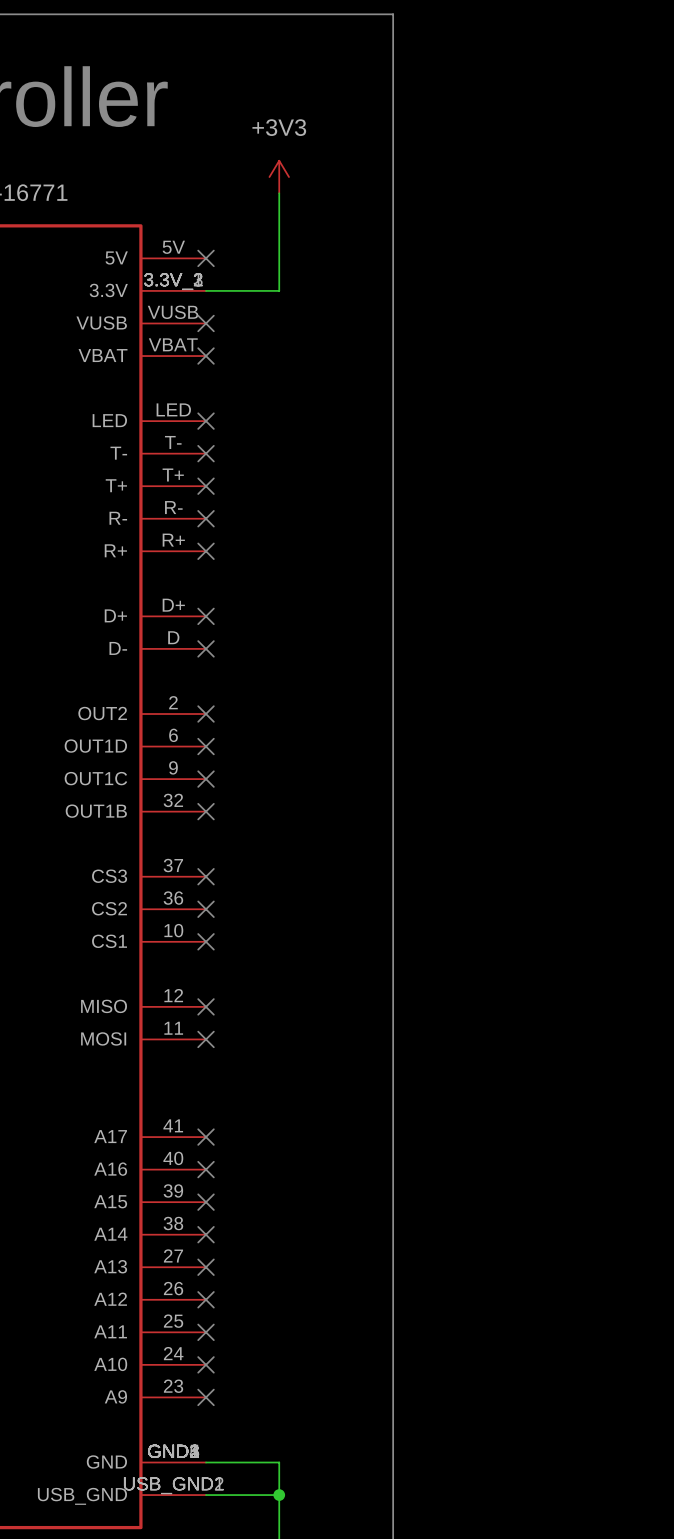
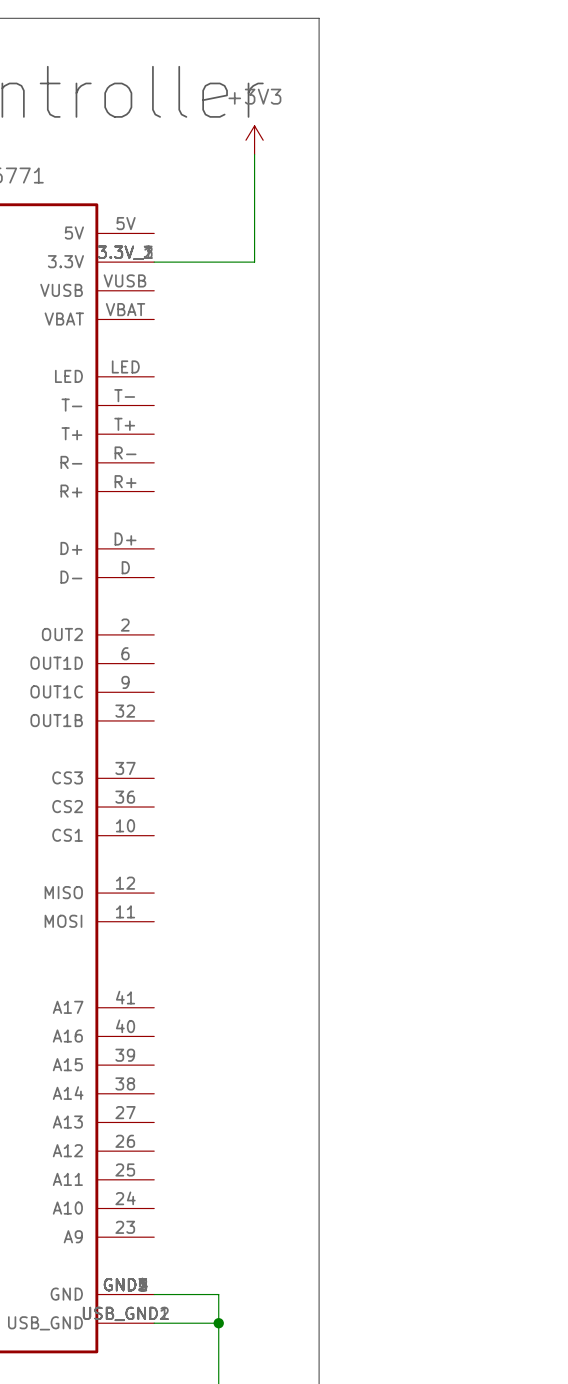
power symbol position: +3V3 (279, 177) -> +3V3 (254, 140)
wire: (279, 193) (279, 290) -> (254, 154) (254, 262) (218, 262)
no-connect mark: (206, 258) -> none
no-connect mark: (206, 323) -> none
no-connect mark: (206, 356) -> none
no-connect mark: (206, 421) -> none
no-connect mark: (206, 453) -> none
no-connect mark: (206, 486) -> none
no-connect mark: (206, 518) -> none
no-connect mark: (206, 551) -> none
no-connect mark: (206, 616) -> none
no-connect mark: (206, 648) -> none
no-connect mark: (206, 714) -> none
no-connect mark: (206, 746) -> none
no-connect mark: (206, 779) -> none
no-connect mark: (206, 811) -> none
no-connect mark: (206, 876) -> none
no-connect mark: (206, 909) -> none
no-connect mark: (206, 941) -> none
no-connect mark: (206, 1006) -> none
no-connect mark: (206, 1039) -> none
no-connect mark: (206, 1137) -> none
no-connect mark: (206, 1169) -> none
no-connect mark: (206, 1202) -> none
no-connect mark: (206, 1234) -> none
no-connect mark: (206, 1267) -> none
no-connect mark: (206, 1299) -> none
no-connect mark: (206, 1332) -> none
no-connect mark: (206, 1364) -> none
no-connect mark: (206, 1397) -> none

